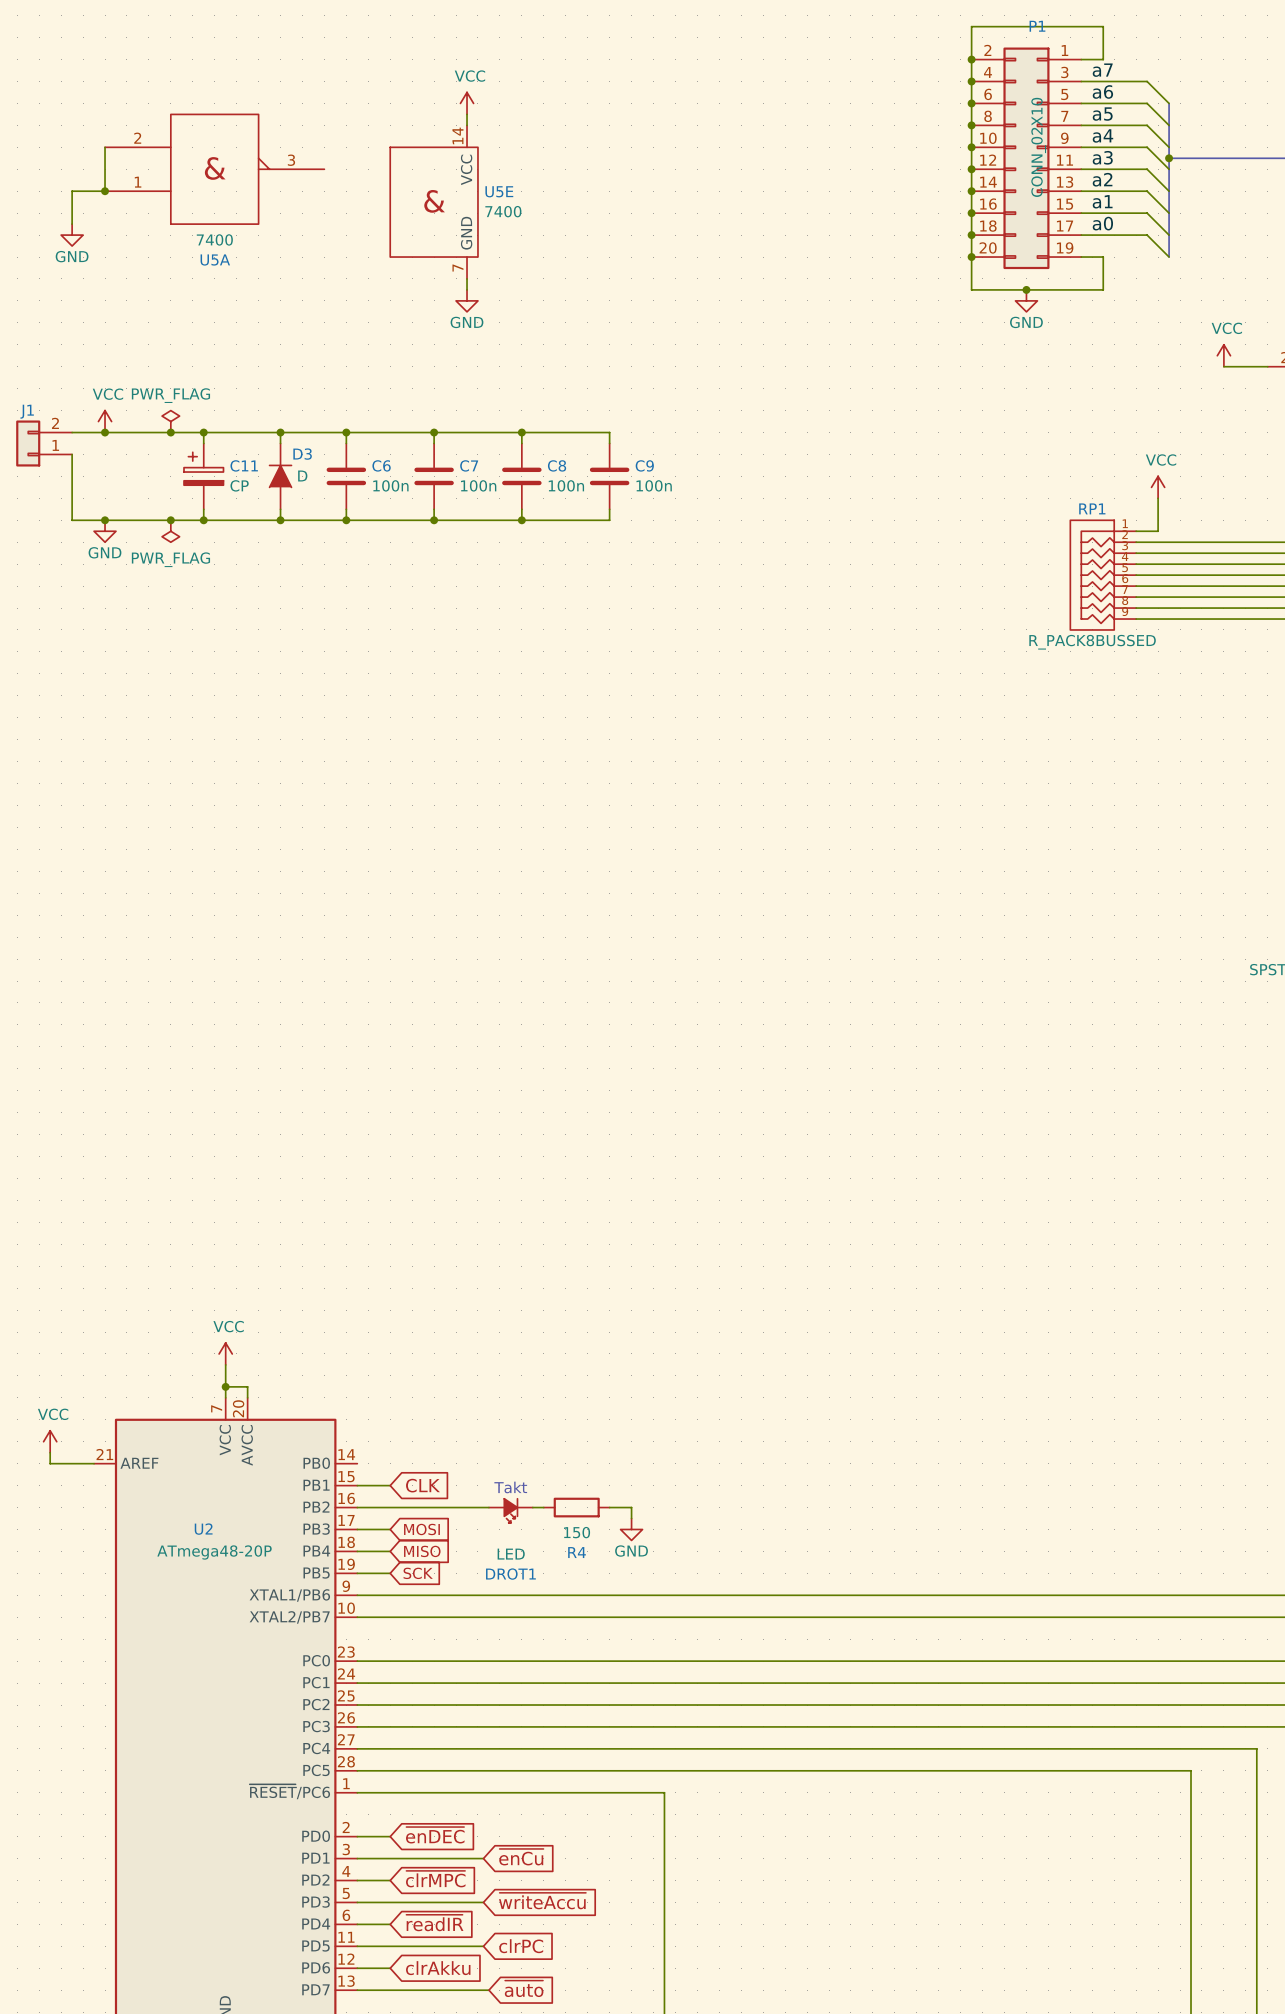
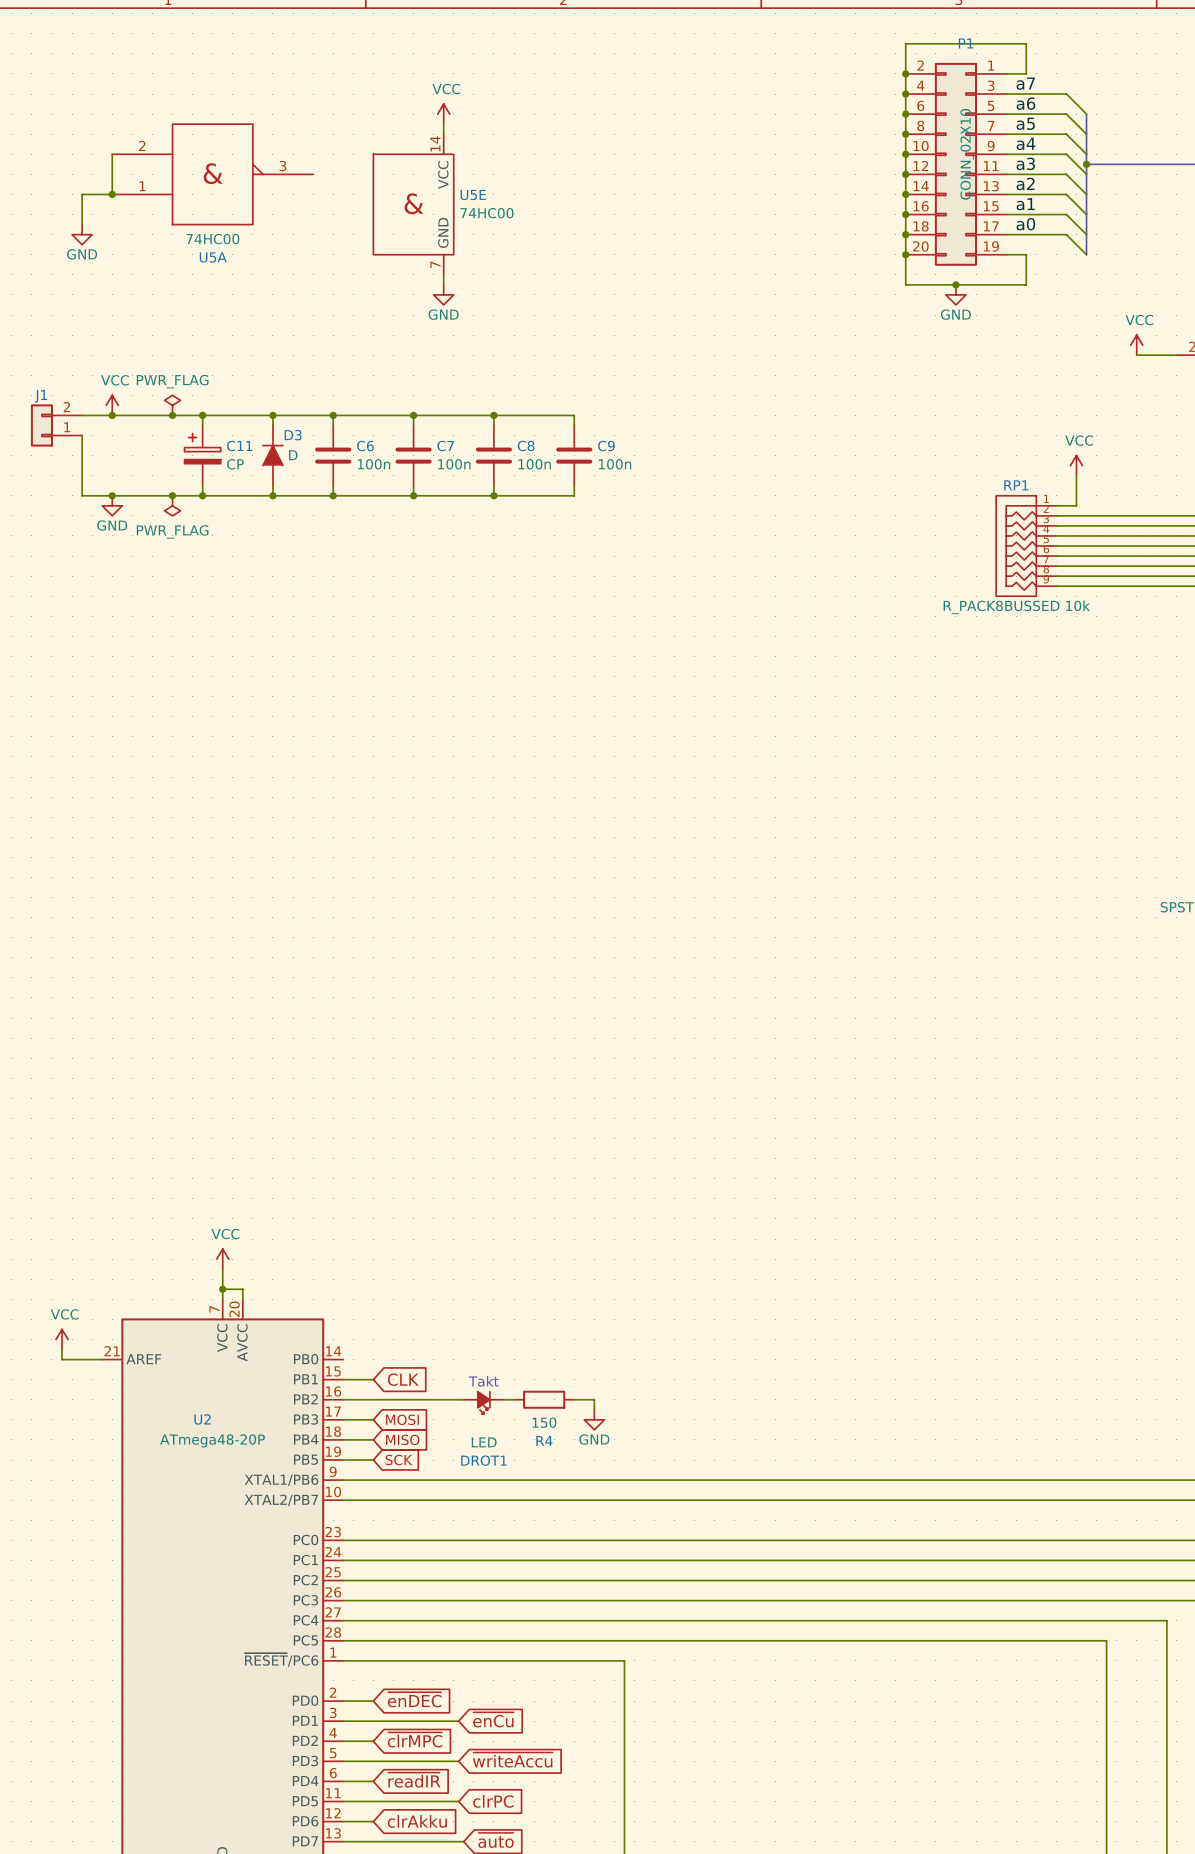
U5E value: 7400 (503, 211) -> 74HC00 (487, 213)
U5A value: 7400 (214, 239) -> 74HC00 (212, 239)
RP1 value: R_PACK8BUSSED (1092, 642) -> R_PACK8BUSSED 10k (1016, 607)

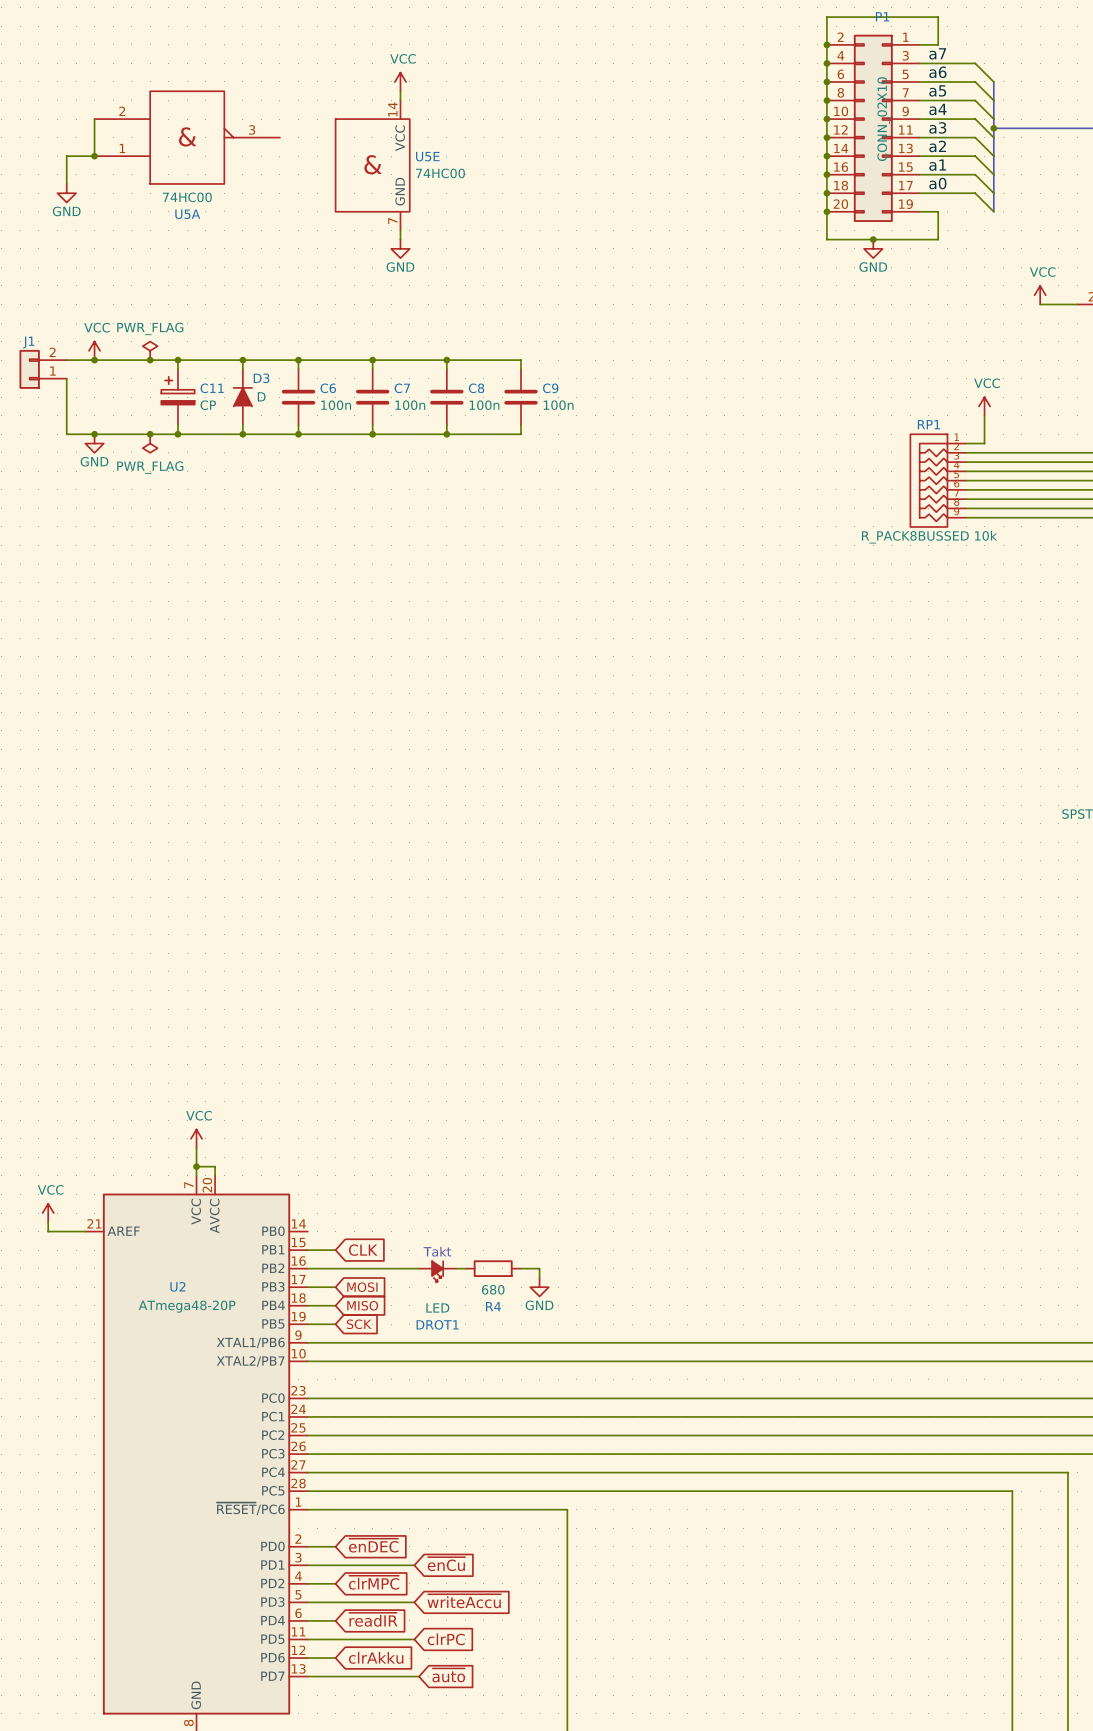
R4 value: 150 (544, 1422) -> 680 (493, 1289)

